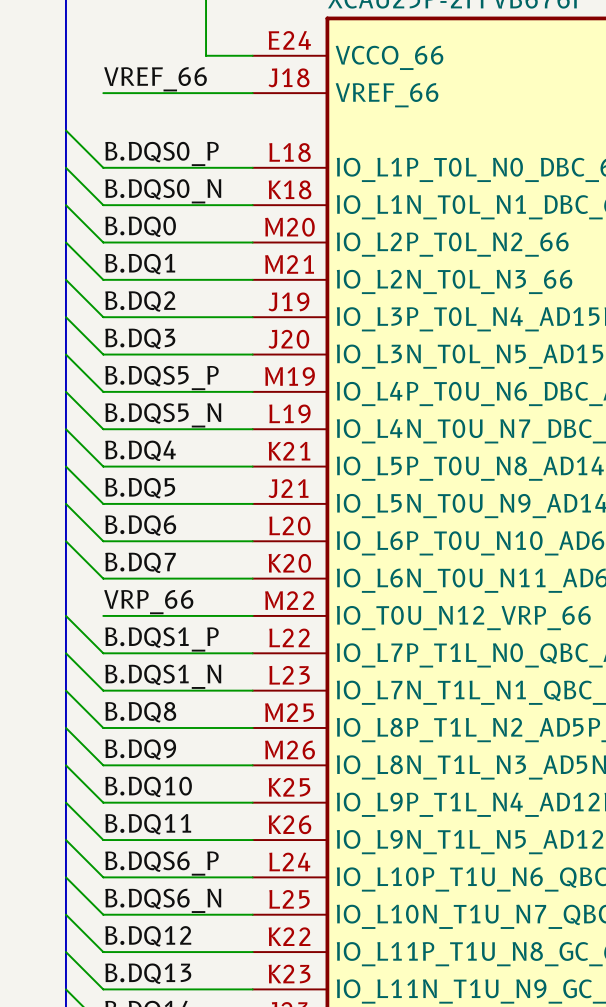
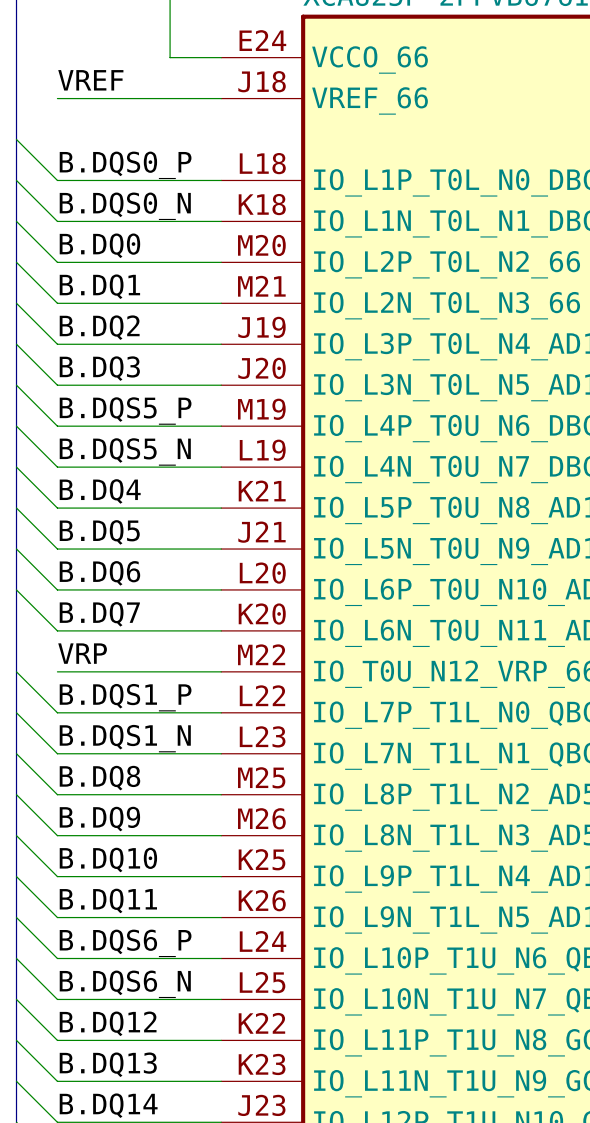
label: VREF_66 (155, 79) -> VREF (90, 80)
label: VRP_66 (148, 602) -> VRP (82, 653)

